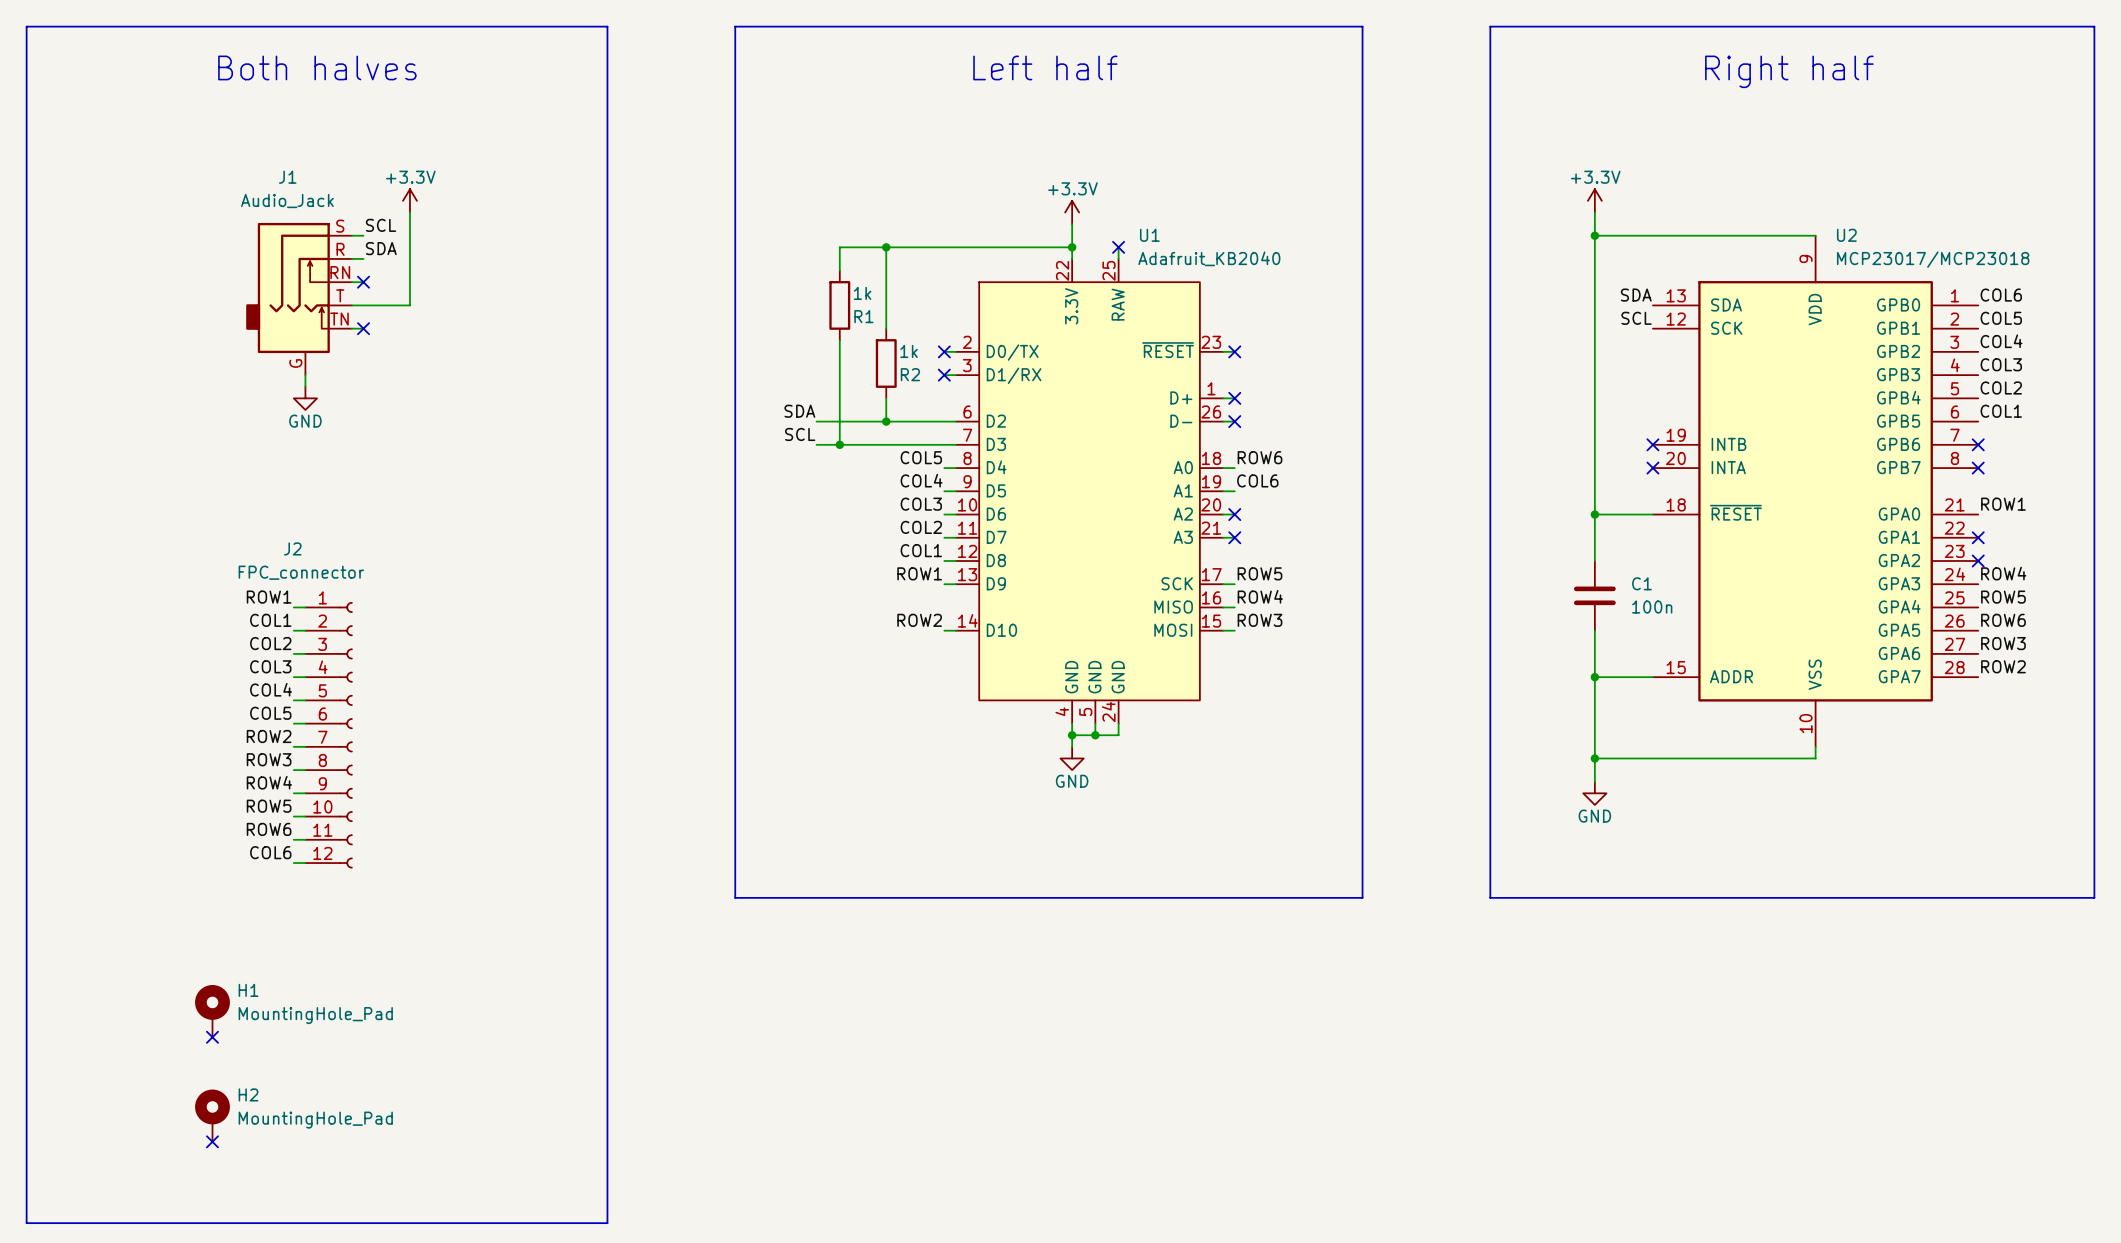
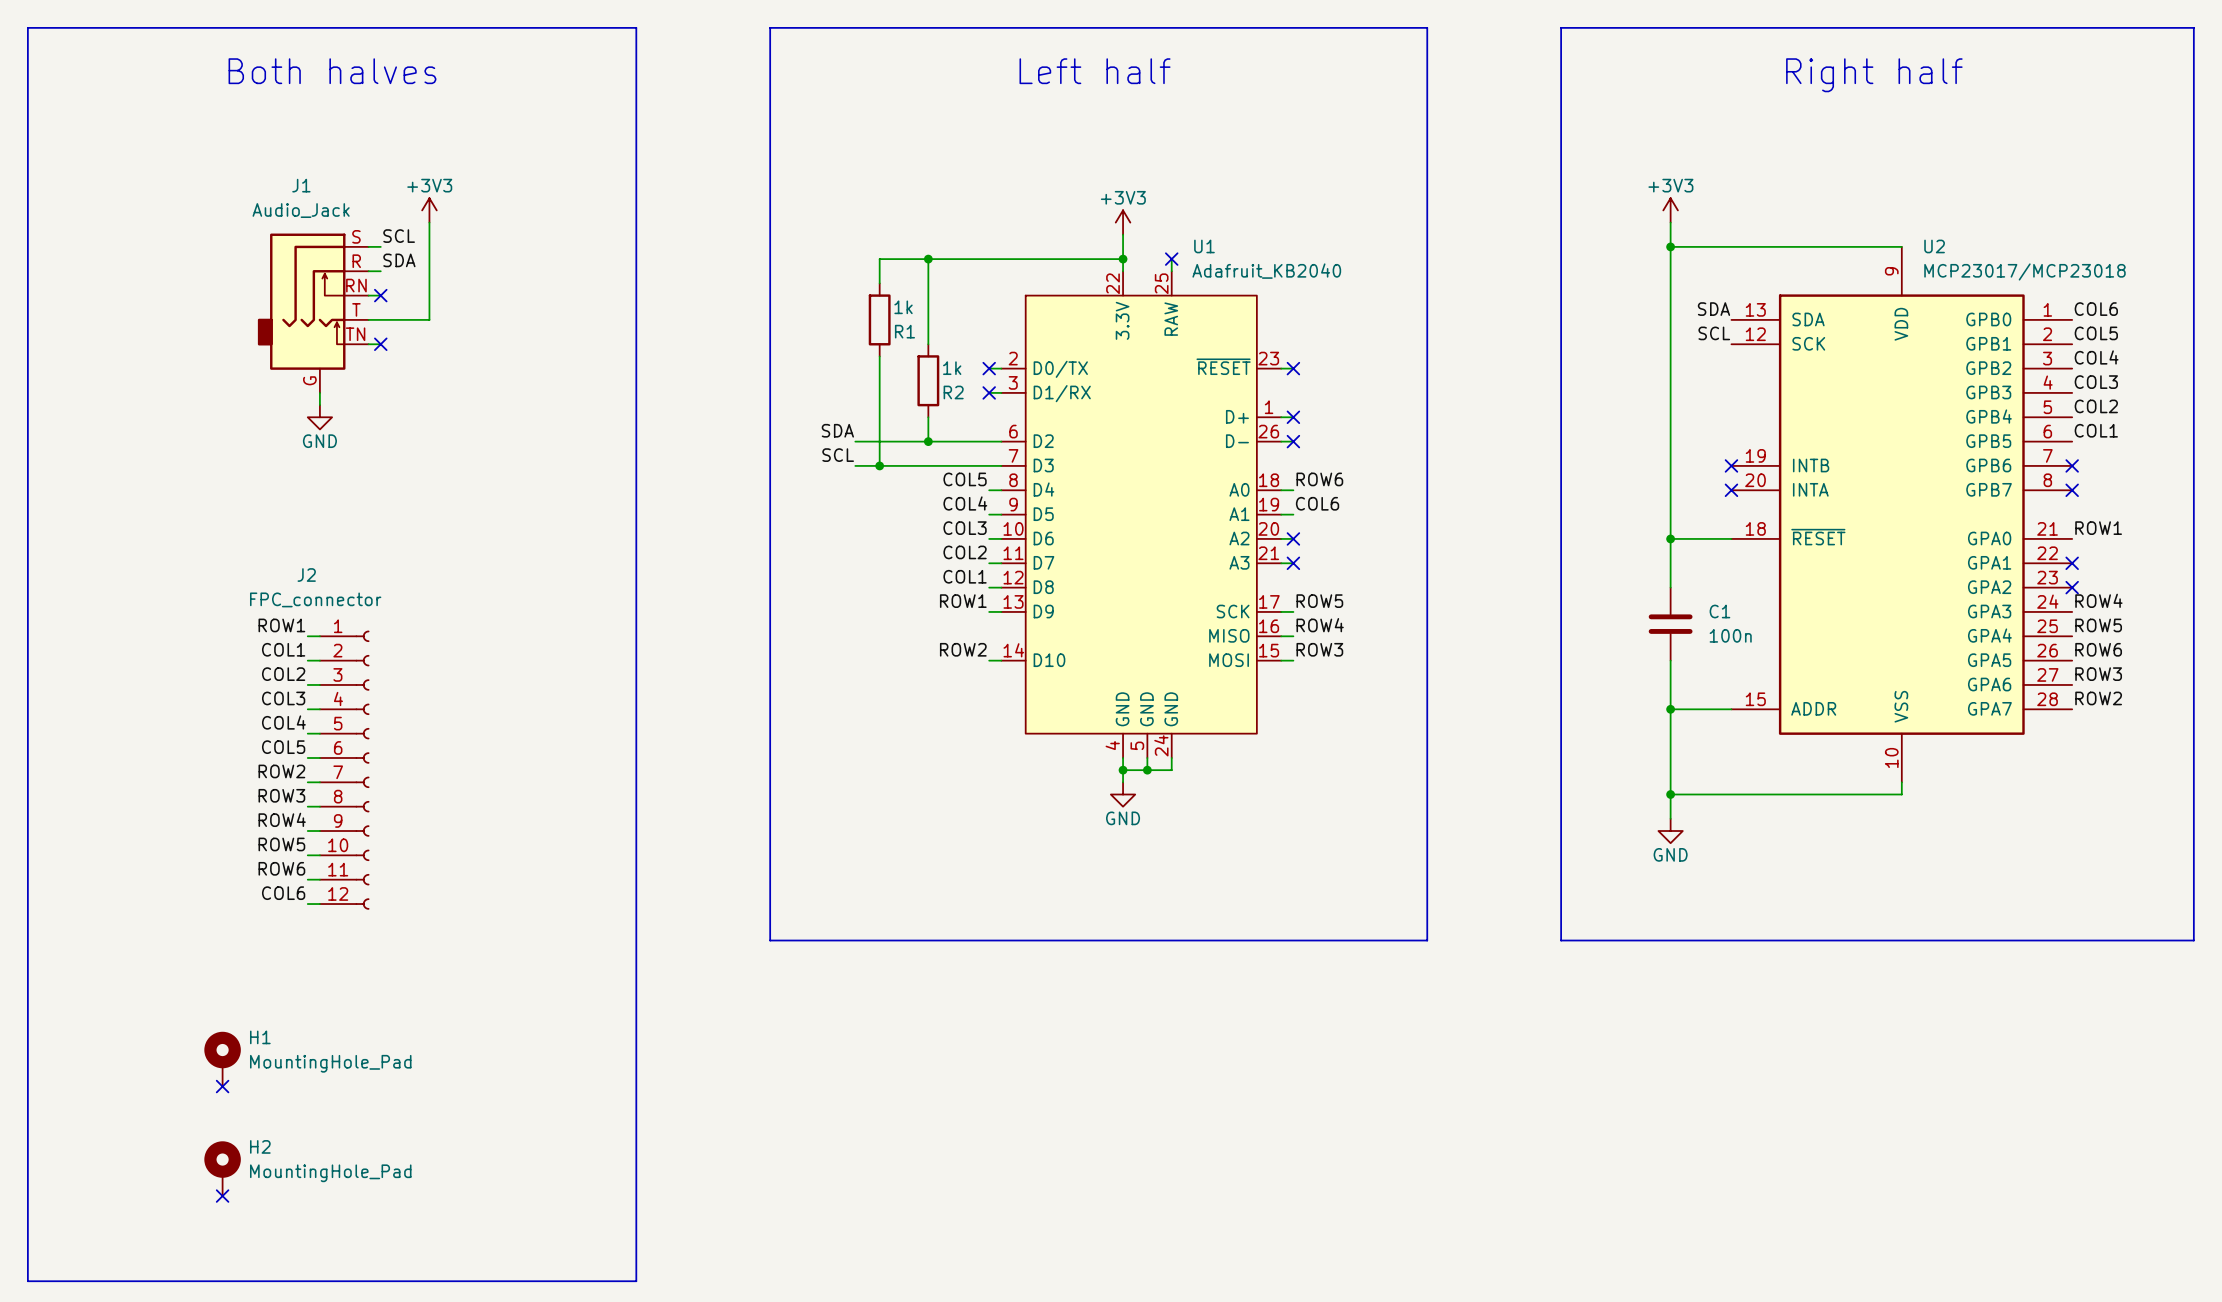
power symbol: +3.3V (409, 200) -> +3V3 (429, 210)
power symbol: +3.3V (1594, 200) -> +3V3 (1670, 210)
power symbol: +3.3V (1072, 212) -> +3V3 (1123, 222)

